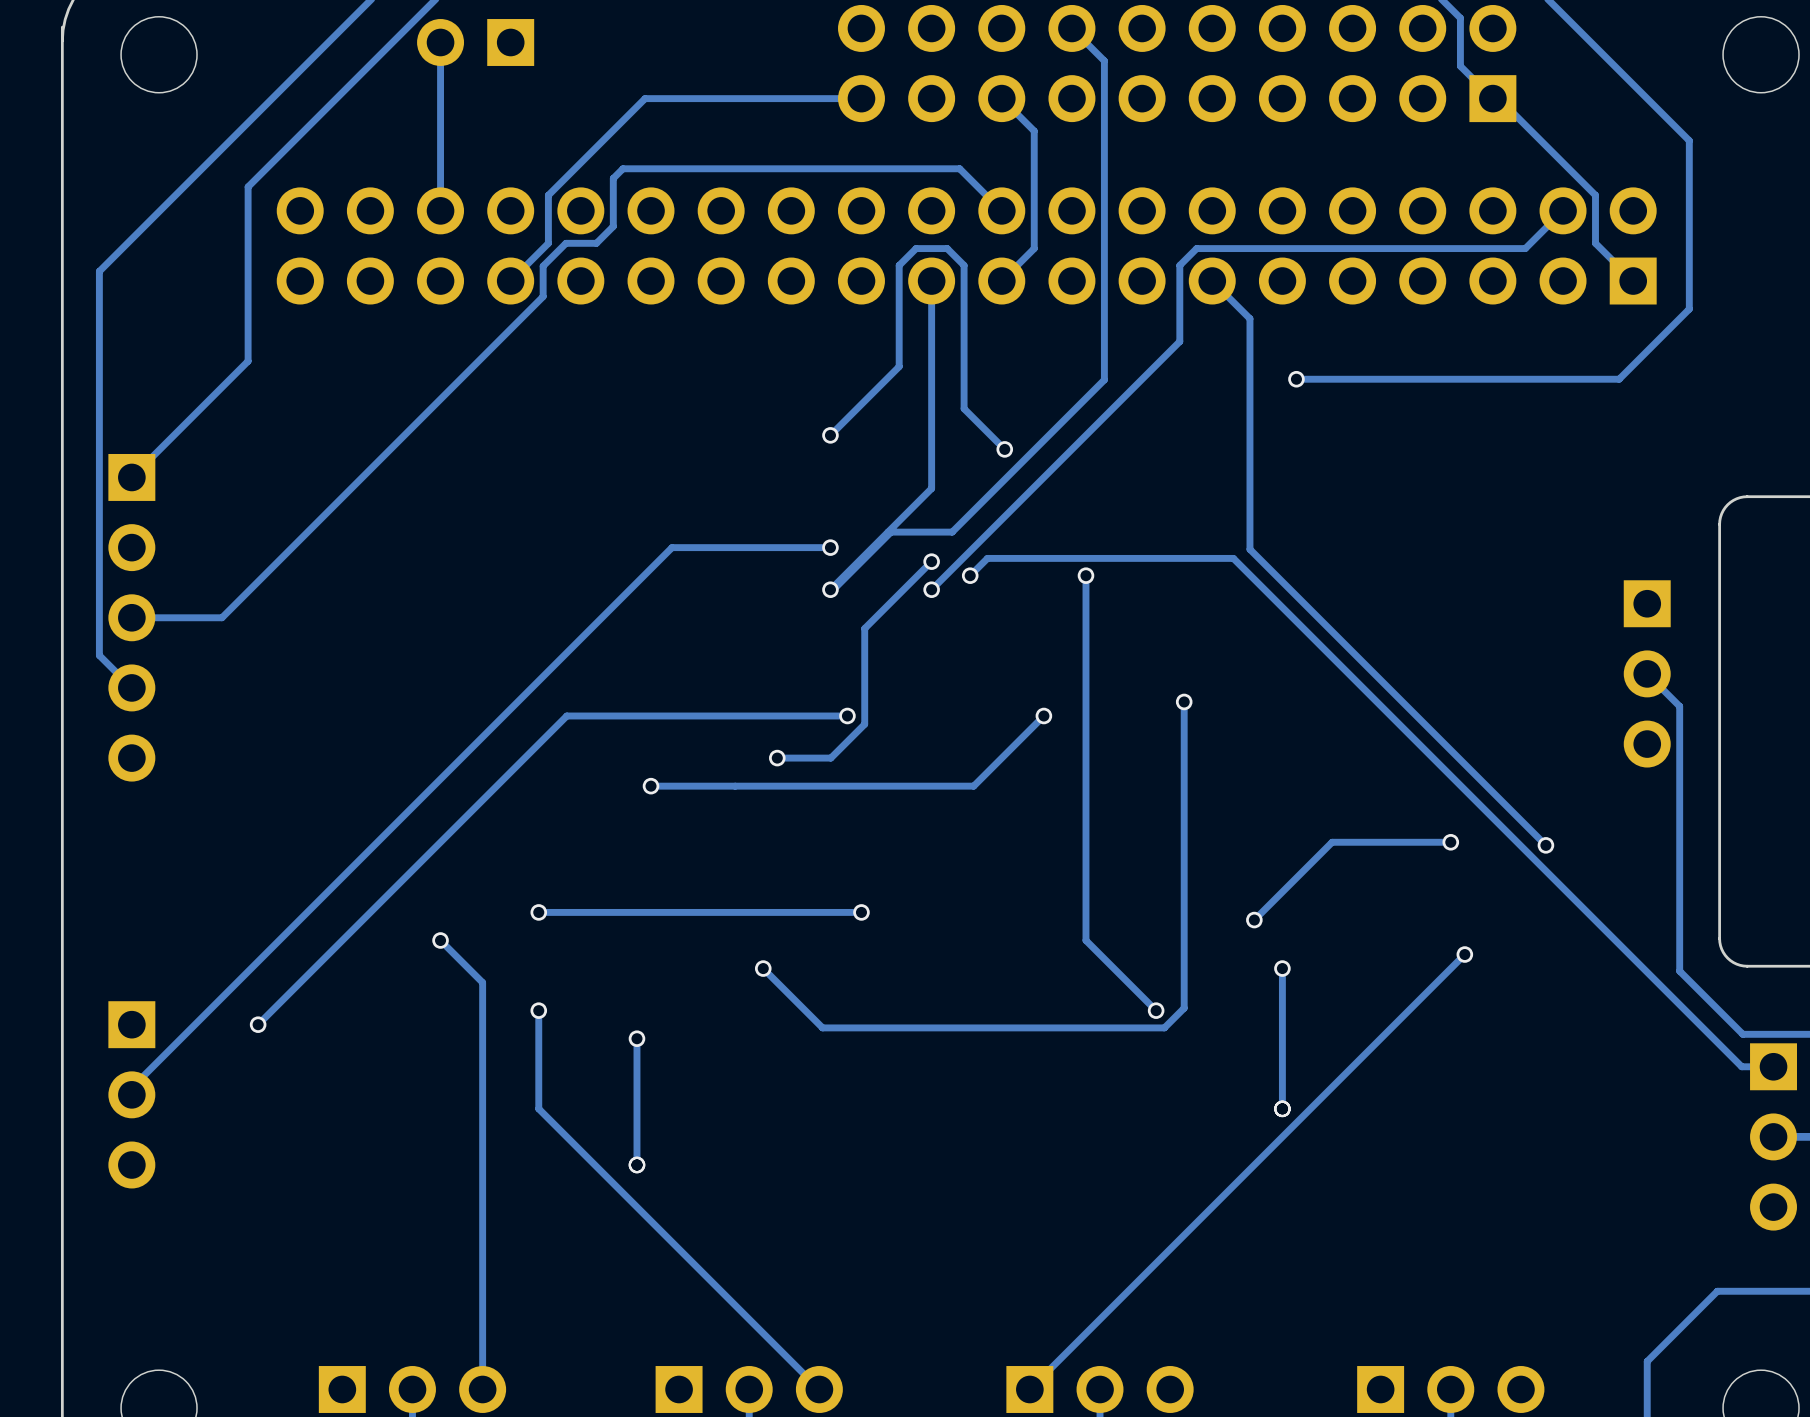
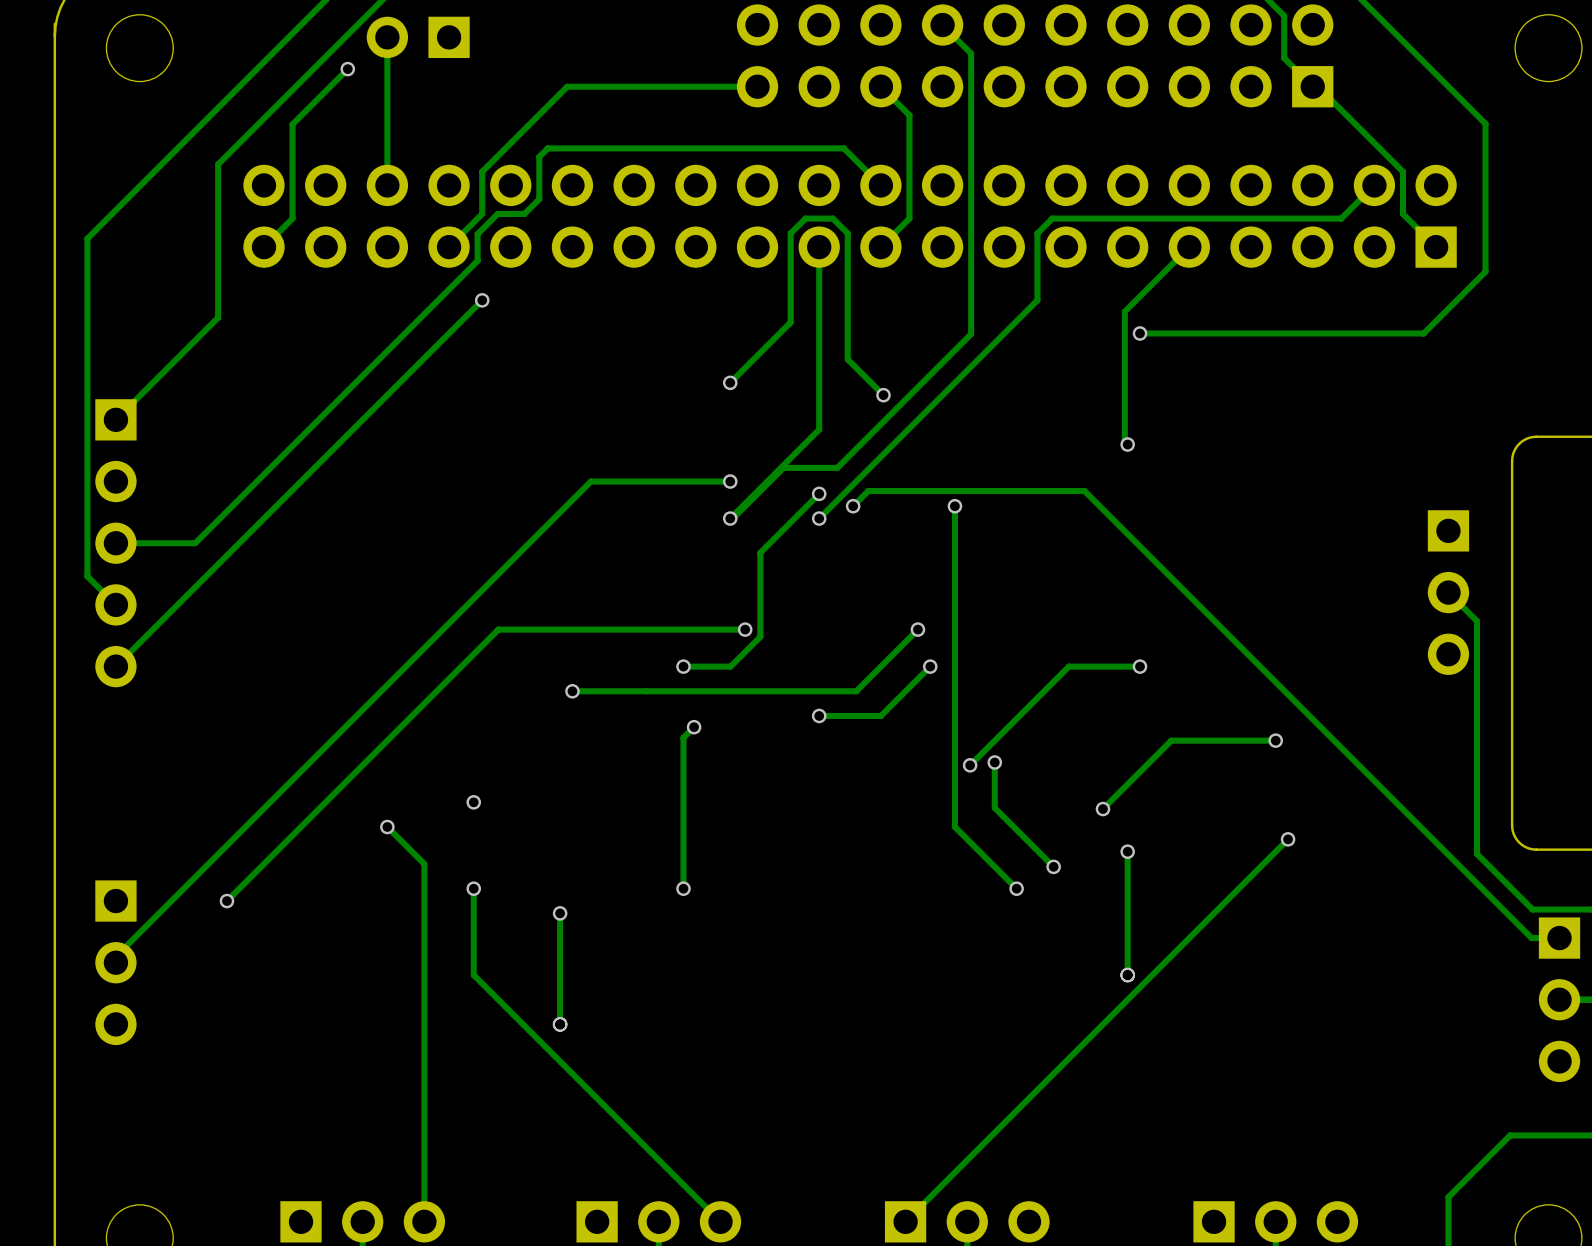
track: none -> (347, 69) (292, 124) (292, 218) (264, 247)
via: none -> (347, 69)
track: (1212, 281) (1249, 318) (1249, 549) (1545, 845) -> none
track: none -> (1189, 247) (1124, 311) (1124, 441) (1127, 444)
track: none -> (482, 300) (115, 666)
via: none -> (482, 300)
via: none -> (1127, 444)
track: (1184, 701) (1184, 1008) (1164, 1027) (822, 1027) (763, 968) -> none
via: (1184, 701) -> none
track: none -> (930, 666) (880, 715) (819, 715)
via: none -> (930, 666)
track: none -> (1140, 666) (1068, 666) (970, 765)
via: none -> (1140, 666)
via: none -> (819, 715)
track: none -> (694, 727) (683, 737) (683, 888)
via: none -> (694, 727)
via: (1545, 845) -> none
track: none -> (994, 762) (994, 808) (1053, 866)
via: none -> (994, 762)
via: none -> (970, 765)
track: (861, 912) (538, 912) -> none
via: (861, 912) -> none
via position: (763, 968) -> (683, 888)
via: none -> (1053, 866)

